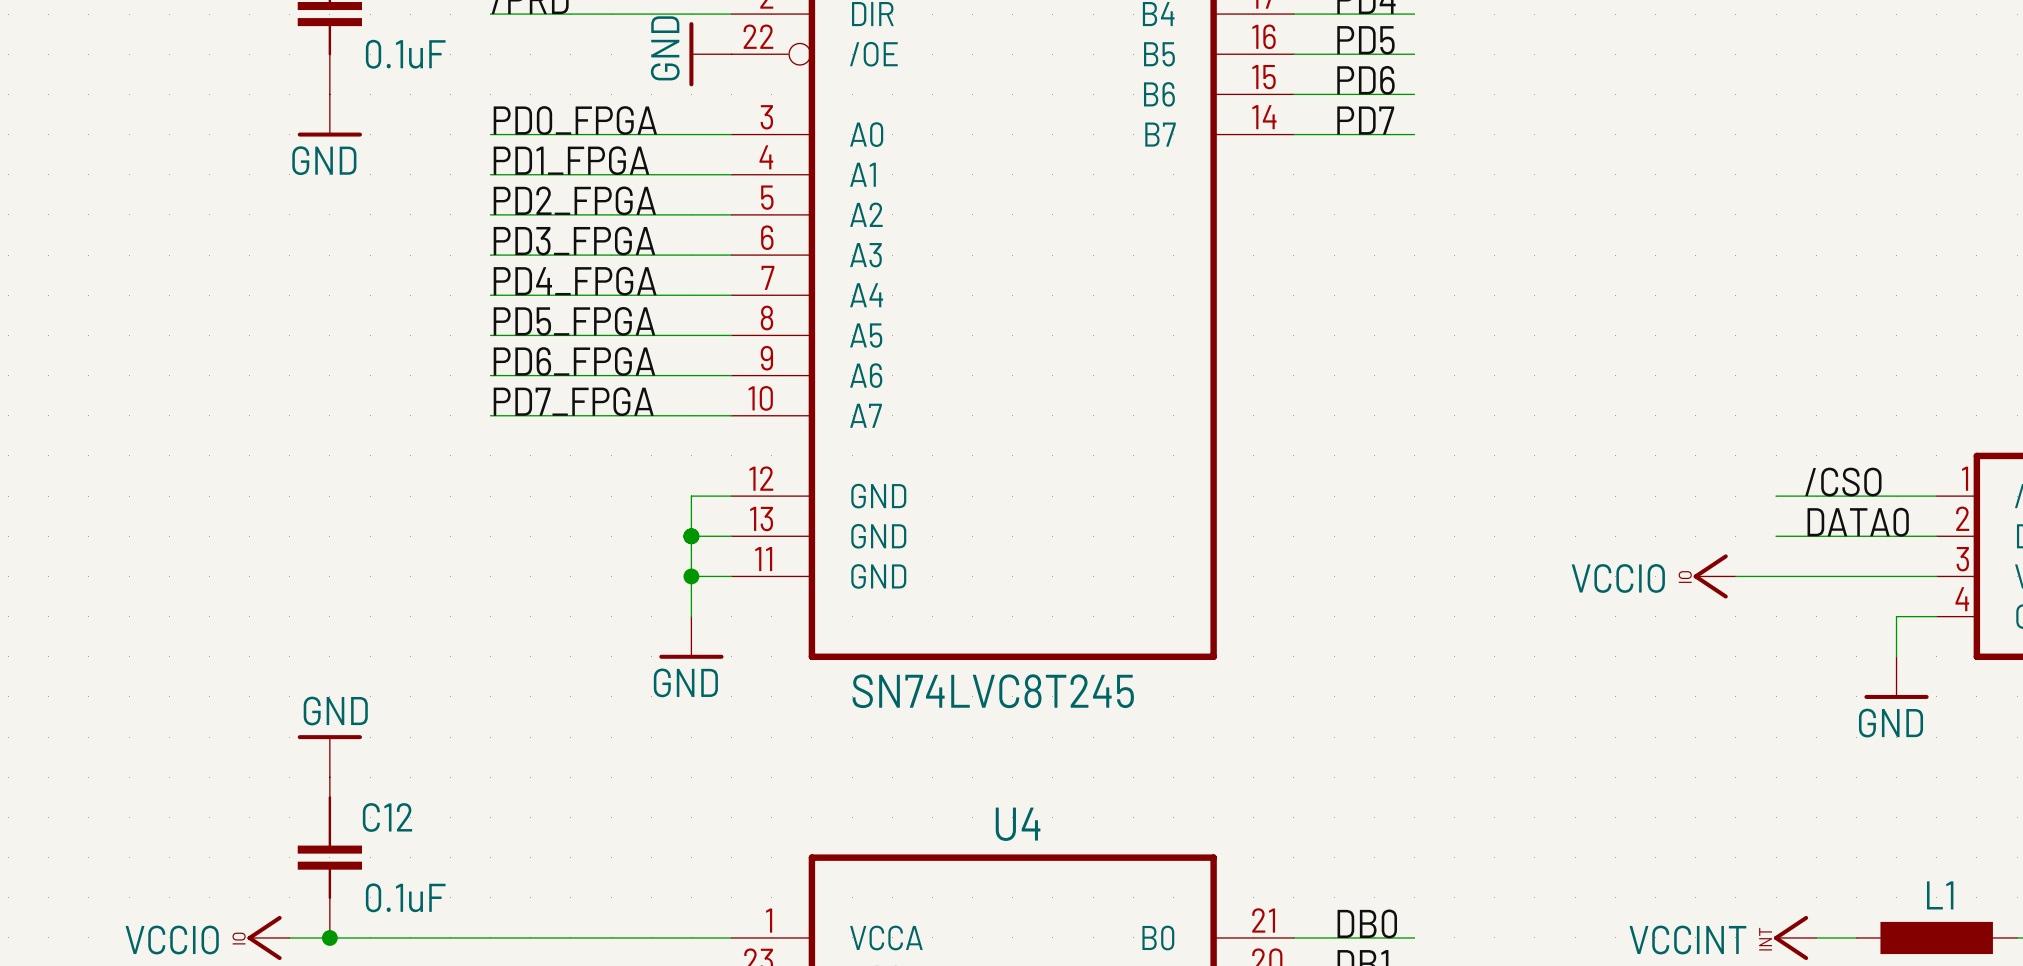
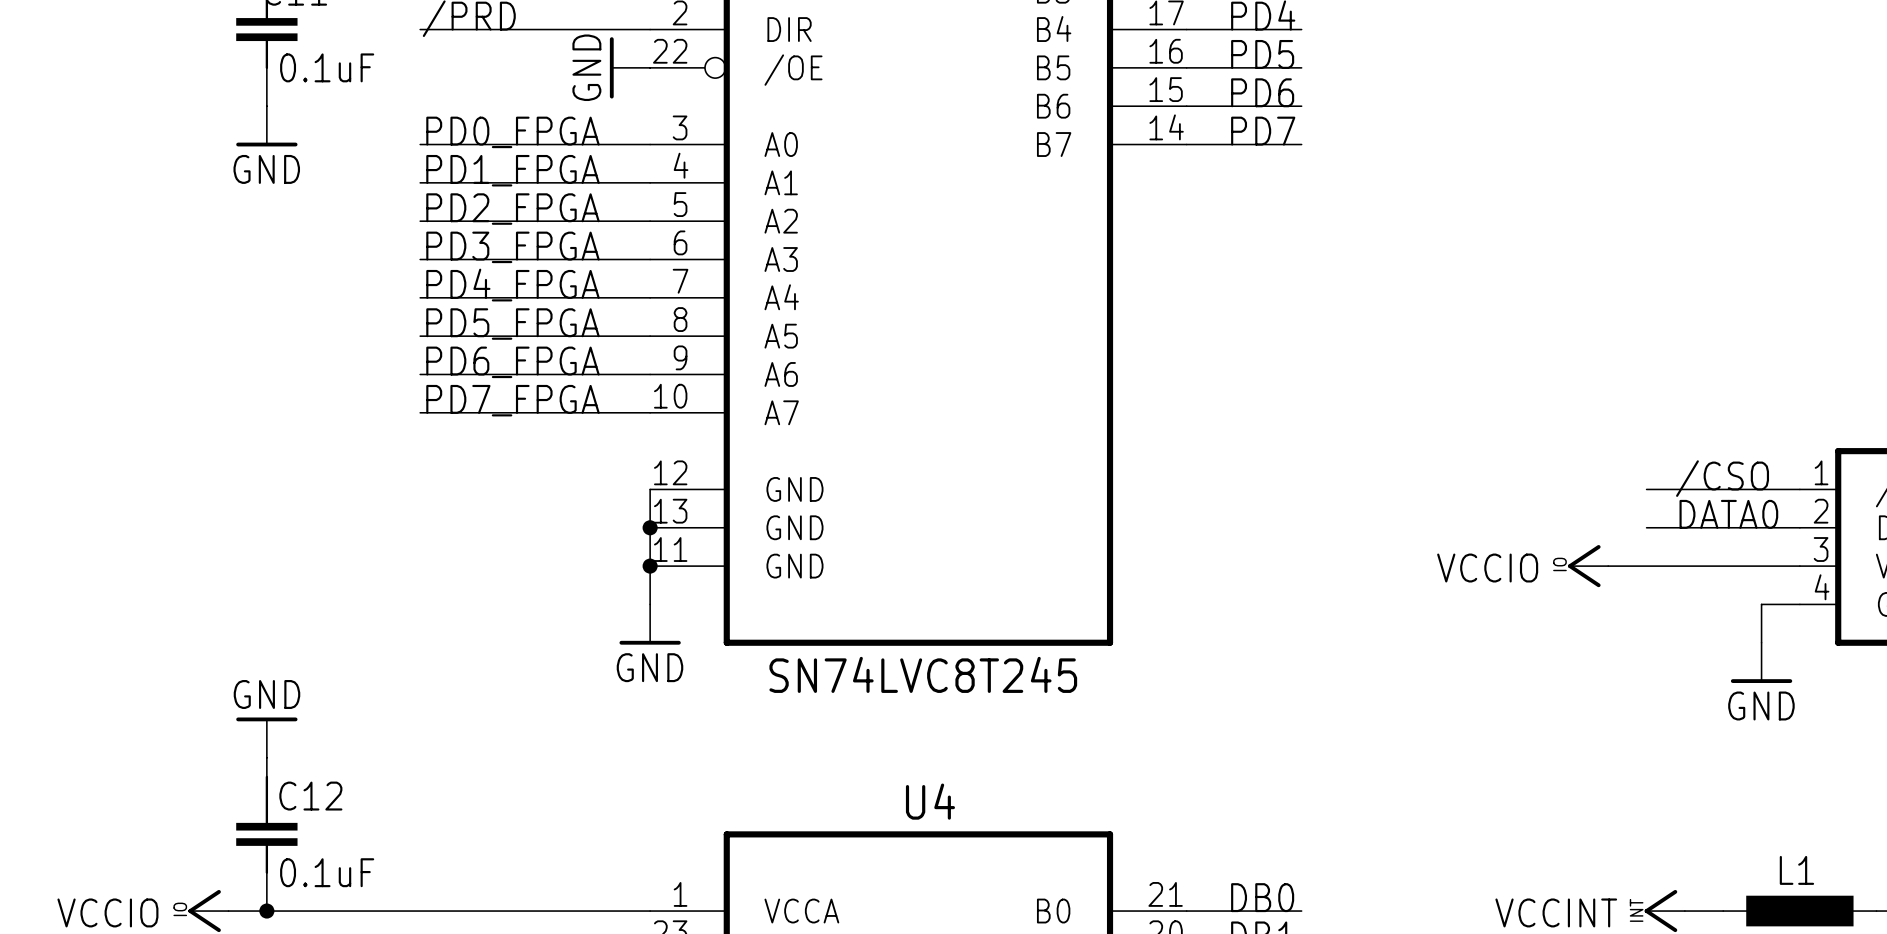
wire: (731, 496) (691, 496) (691, 616) -> (650, 489) (650, 604)
wire: (691, 536) (731, 536) -> none
junction: (691, 536) -> none
junction: none -> (650, 527)
wire: (691, 576) (731, 576) -> none
junction: (691, 576) -> none
junction: none -> (650, 566)
power symbol position: GND (691, 637) -> GND (650, 624)

